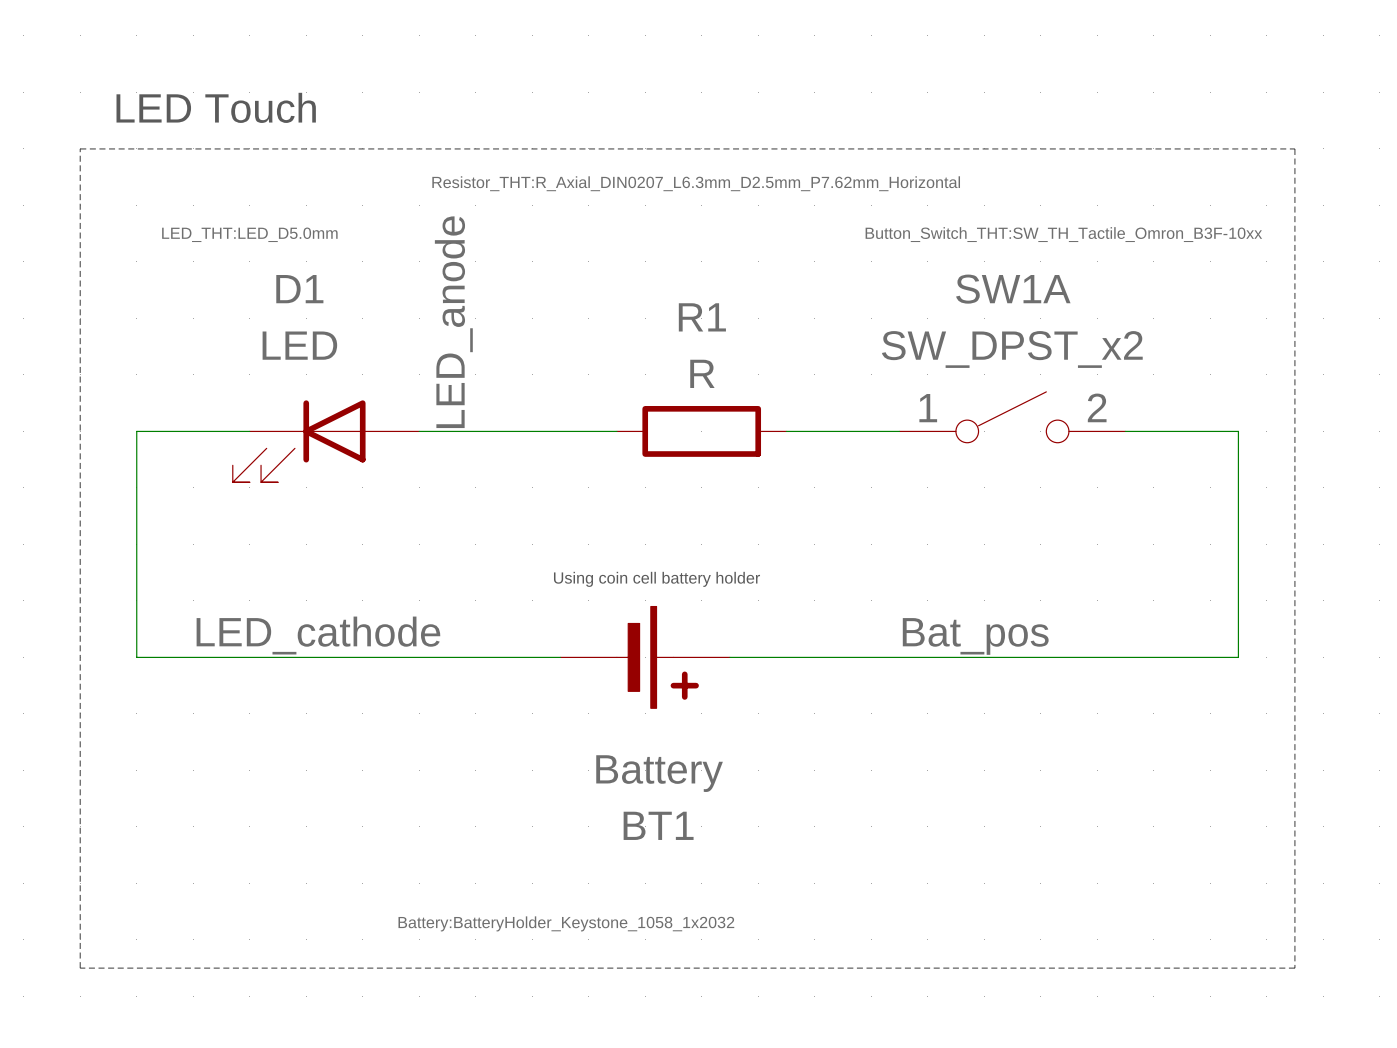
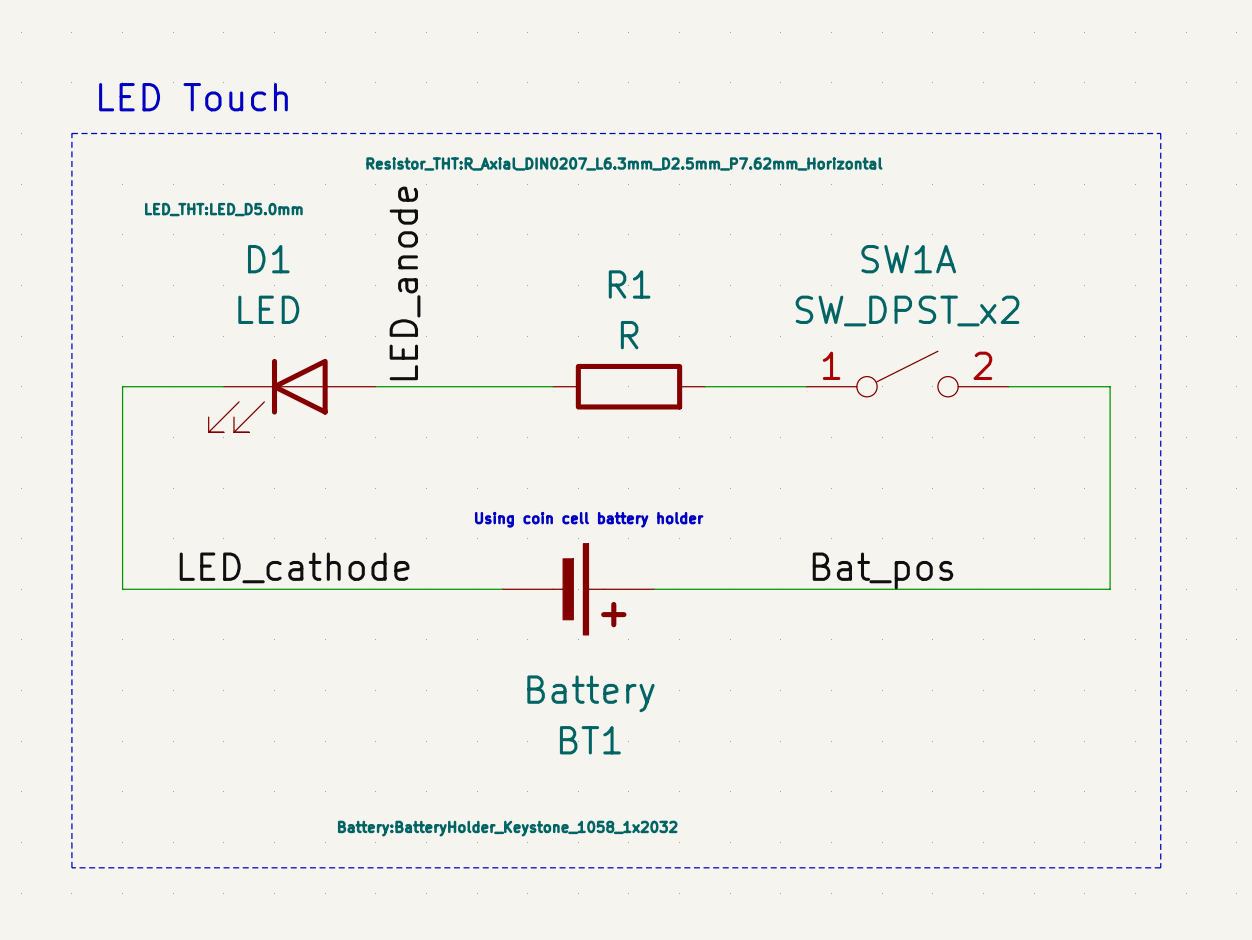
SW1A text: Button_Switch_THT:SW_TH_Tactile_Omron_B3F-10xx (1063, 234) -> none

